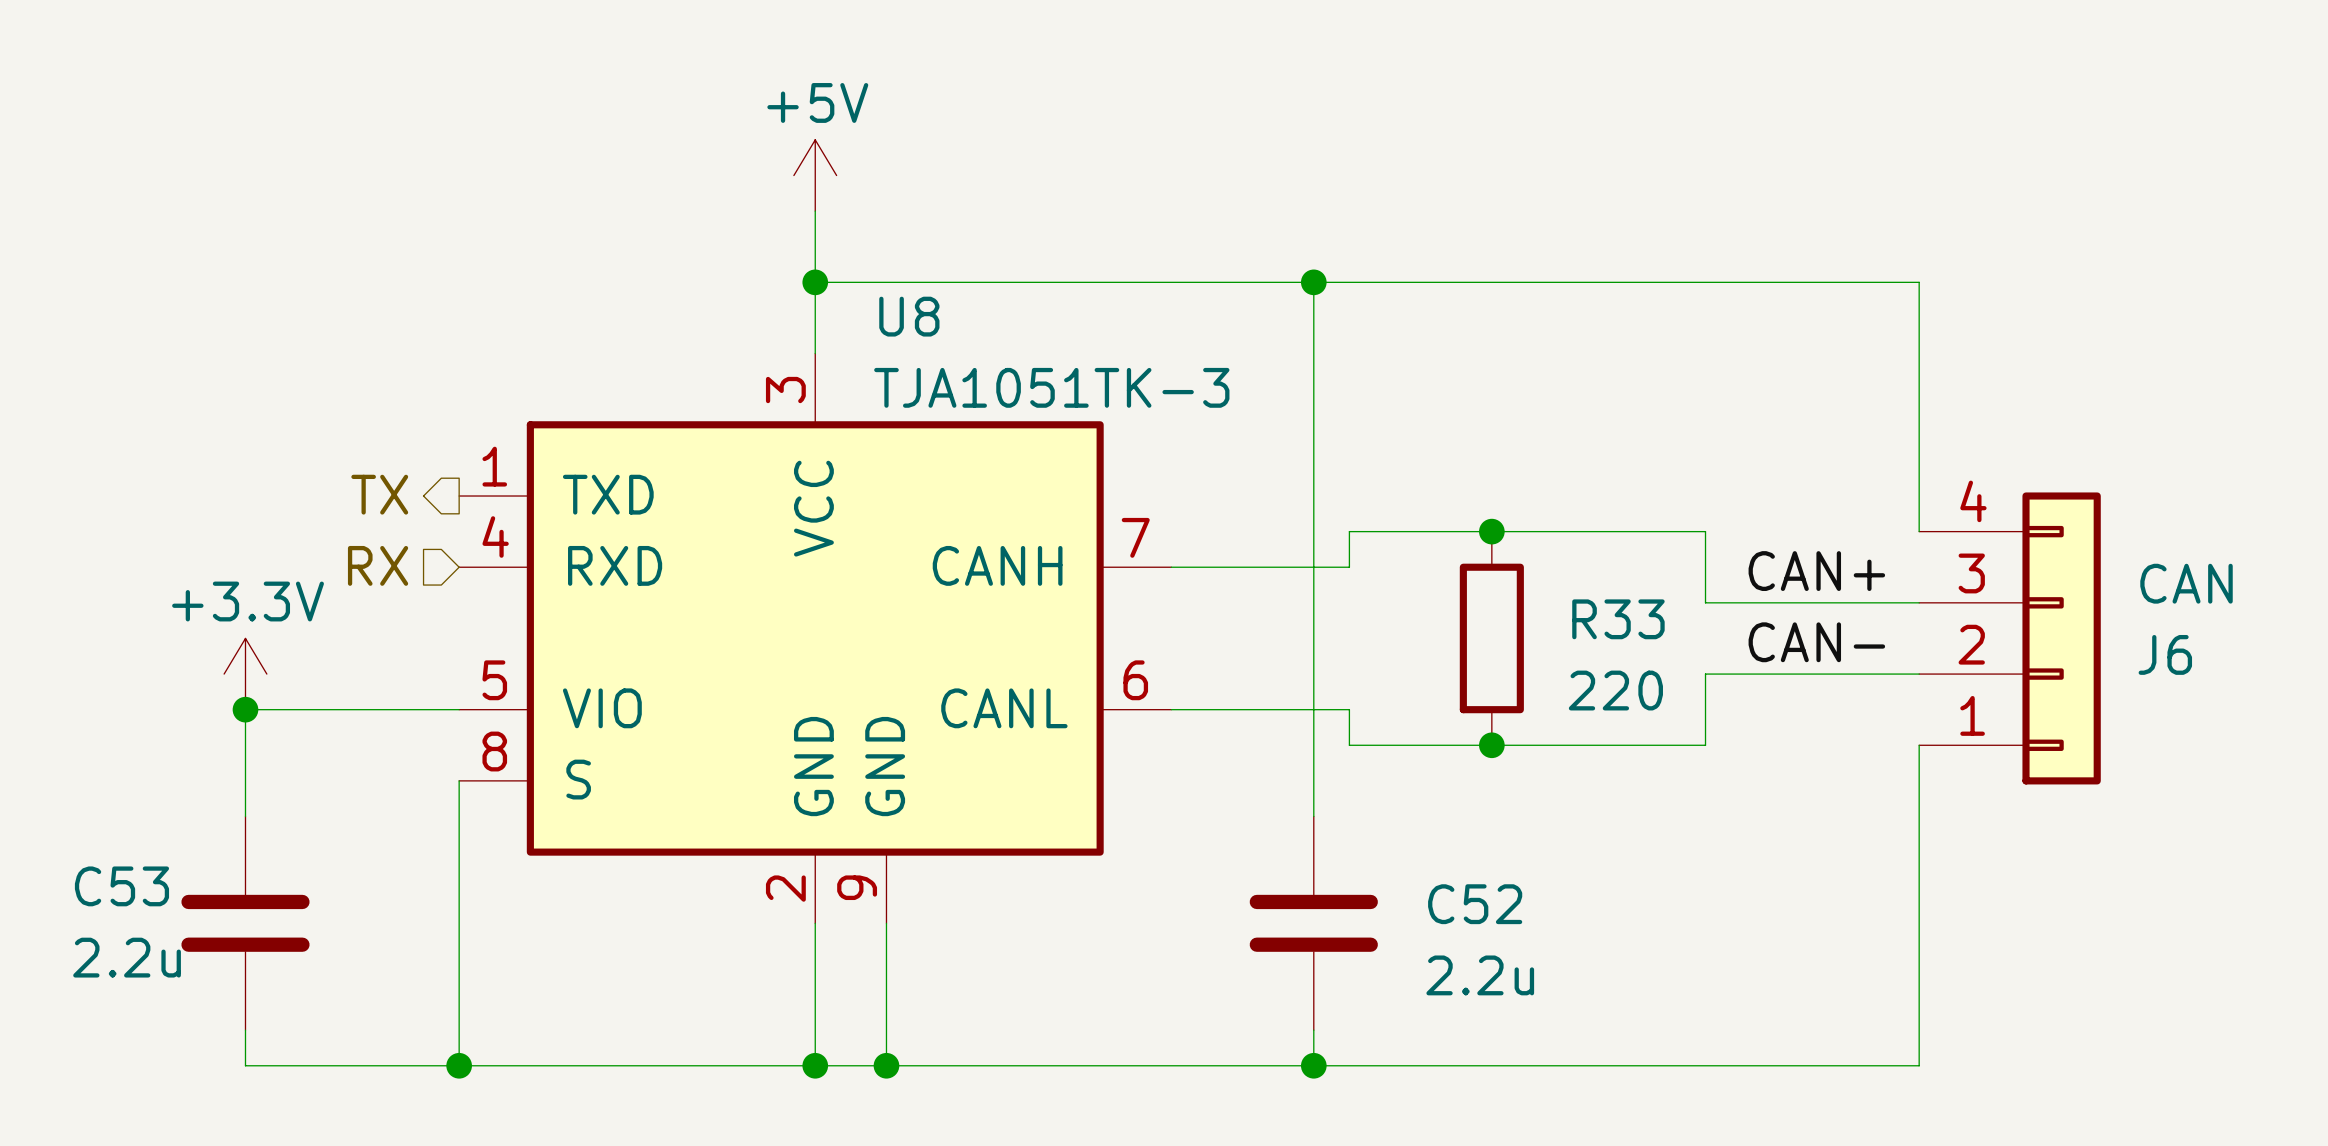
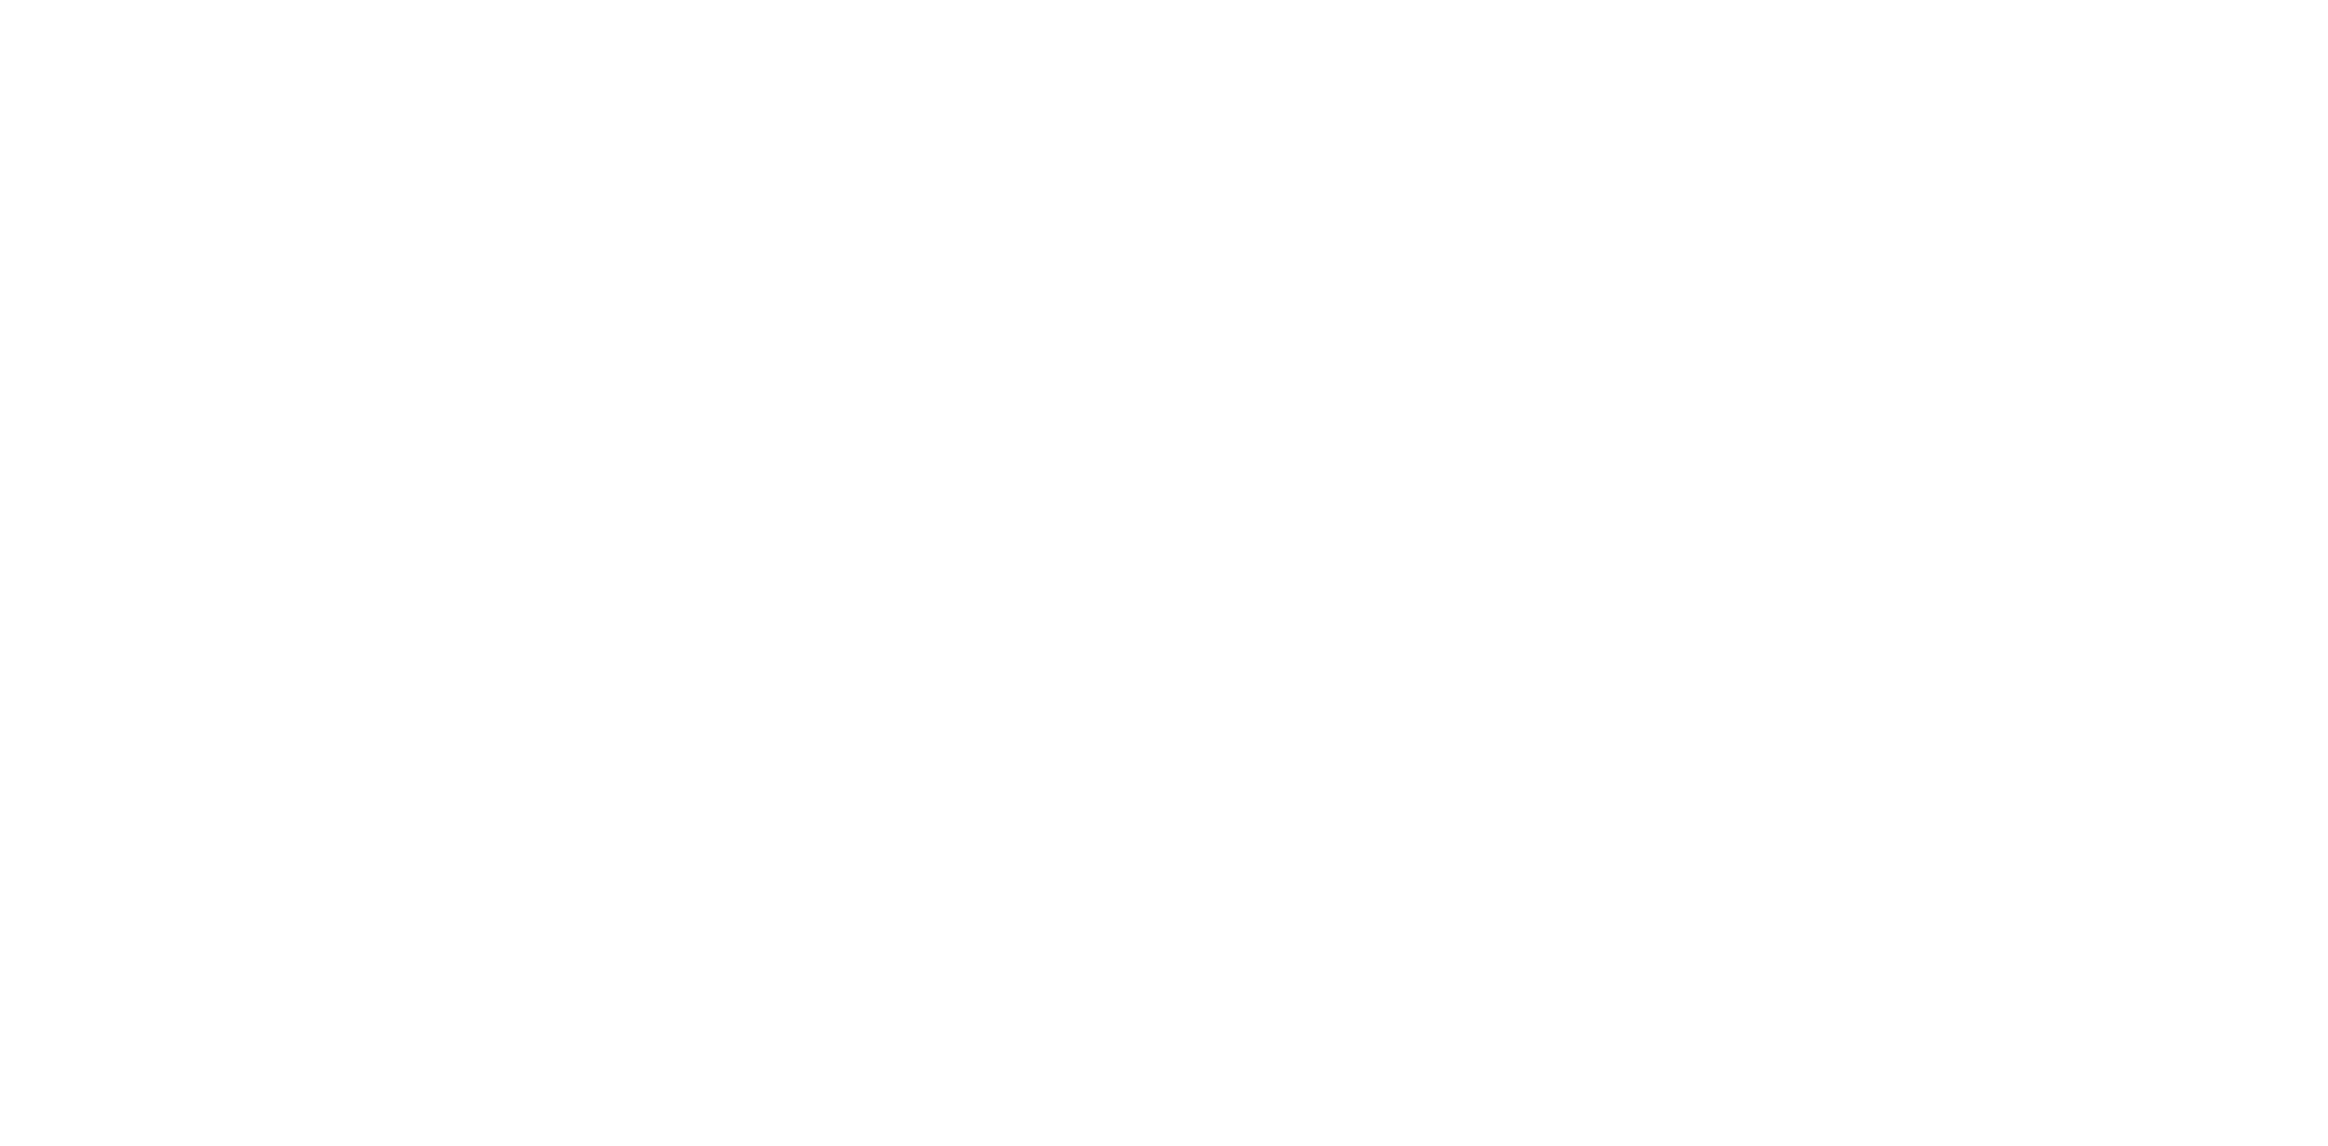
power symbol: +5V (815, 175) -> none
wire: (815, 211) (815, 353) -> none
wire: (815, 282) (1919, 282) (1919, 531) -> none
junction: (815, 282) -> none
wire: (1313, 282) (1313, 816) -> none
junction: (1313, 282) -> none
hierarchical label: TX (379, 494) -> none
junction: (1491, 531) -> none
hierarchical label: RX (378, 565) -> none
wire: (1171, 567) (1349, 567) (1349, 531) (1705, 531) (1705, 602) (1919, 602) -> none
label: CAN+ (1816, 571) -> none
U8: TJA1051TK-3 (815, 638) -> none
R33: 220 (1491, 638) -> none
J6: CAN (2009, 638) -> none
label: CAN- (1816, 642) -> none
power symbol: +3.3V (245, 674) -> none
wire: (1919, 674) (1705, 674) (1705, 745) (1349, 745) (1349, 709) (1171, 709) -> none
junction: (245, 709) -> none
wire: (459, 709) (245, 709) (245, 816) -> none
junction: (1491, 745) -> none
wire: (1919, 745) (1919, 1065) (245, 1065) (245, 1030) -> none
wire: (459, 780) (459, 1065) -> none
C53: 2.2u (245, 923) -> none
wire: (815, 923) (815, 1065) -> none
wire: (886, 923) (886, 1065) -> none
C52: 2.2u (1313, 923) -> none
wire: (1313, 1030) (1313, 1065) -> none
junction: (459, 1065) -> none
junction: (815, 1065) -> none
junction: (886, 1065) -> none
junction: (1313, 1065) -> none

